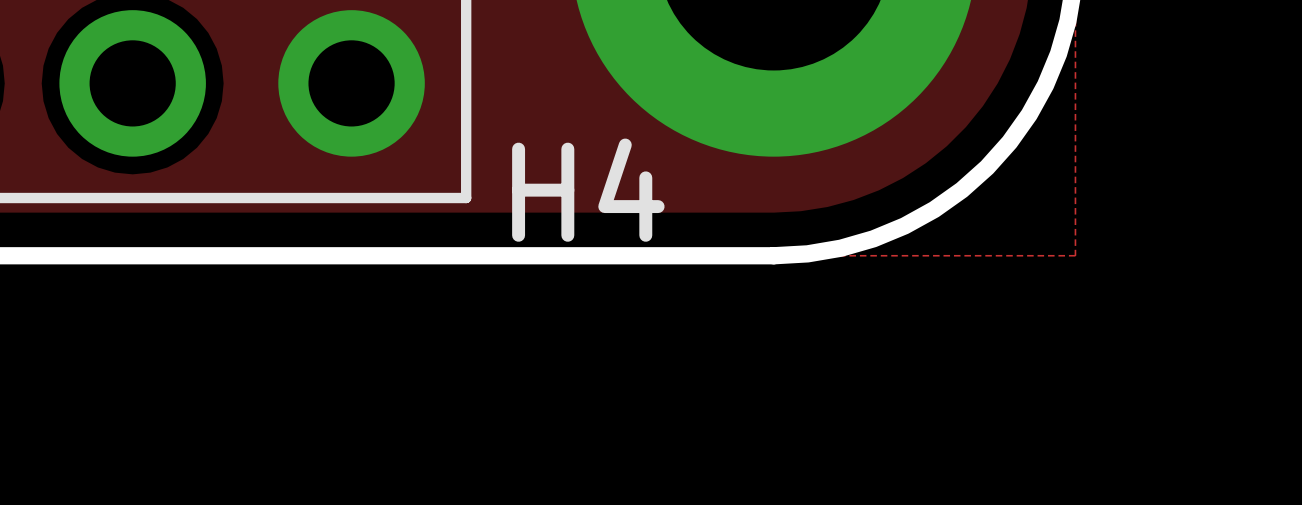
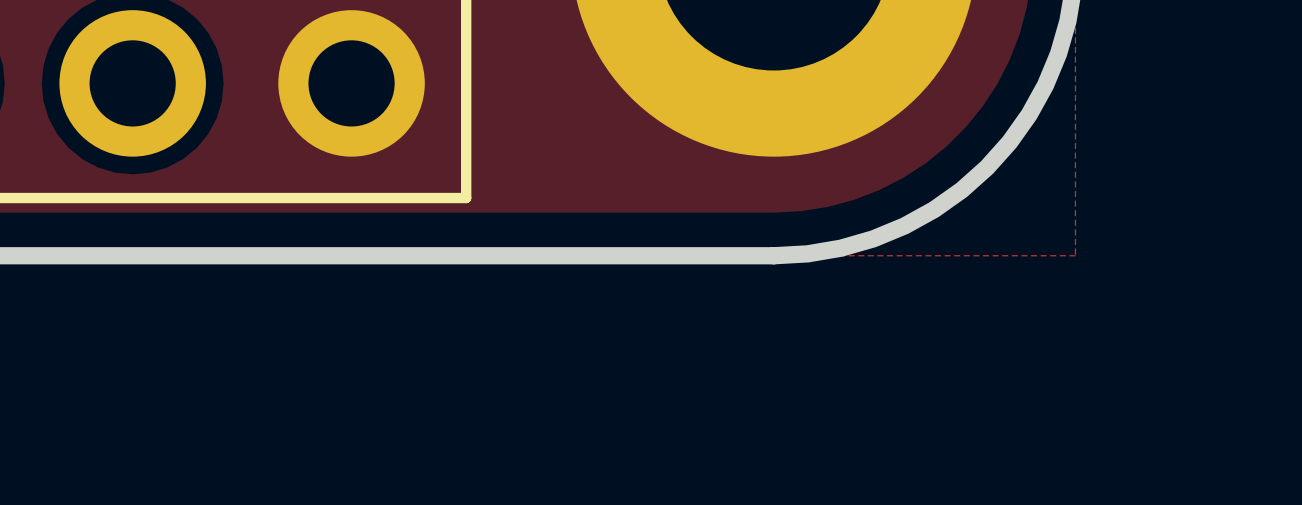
H4 name: H4 (588, 190) -> none

